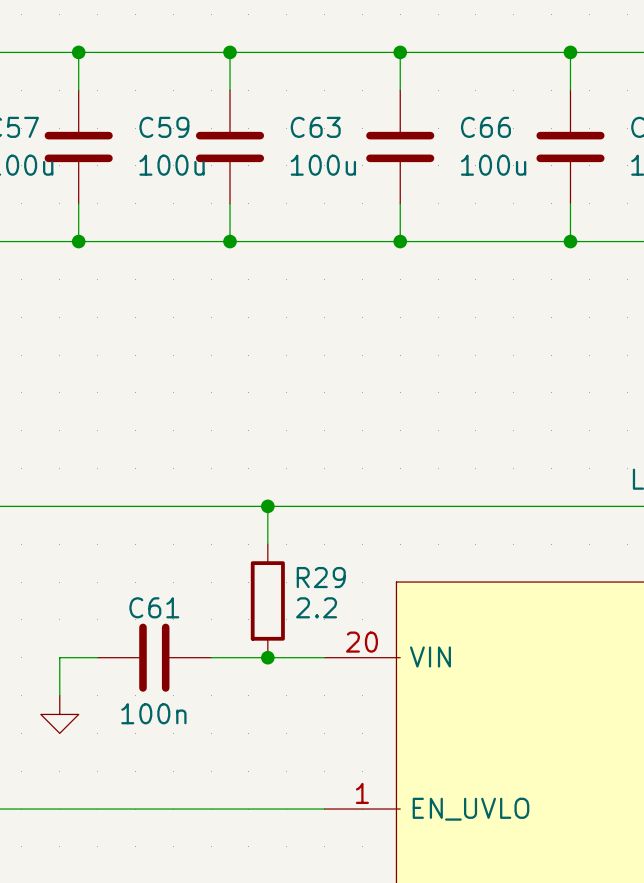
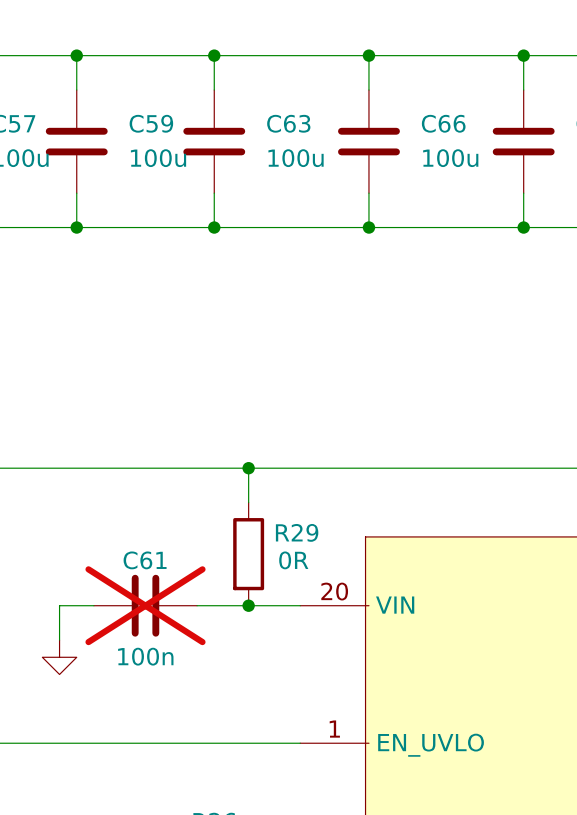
R29 value: 2.2 (316, 607) -> 0R (293, 560)
C61 do-not-place cross: none -> (145, 605)

